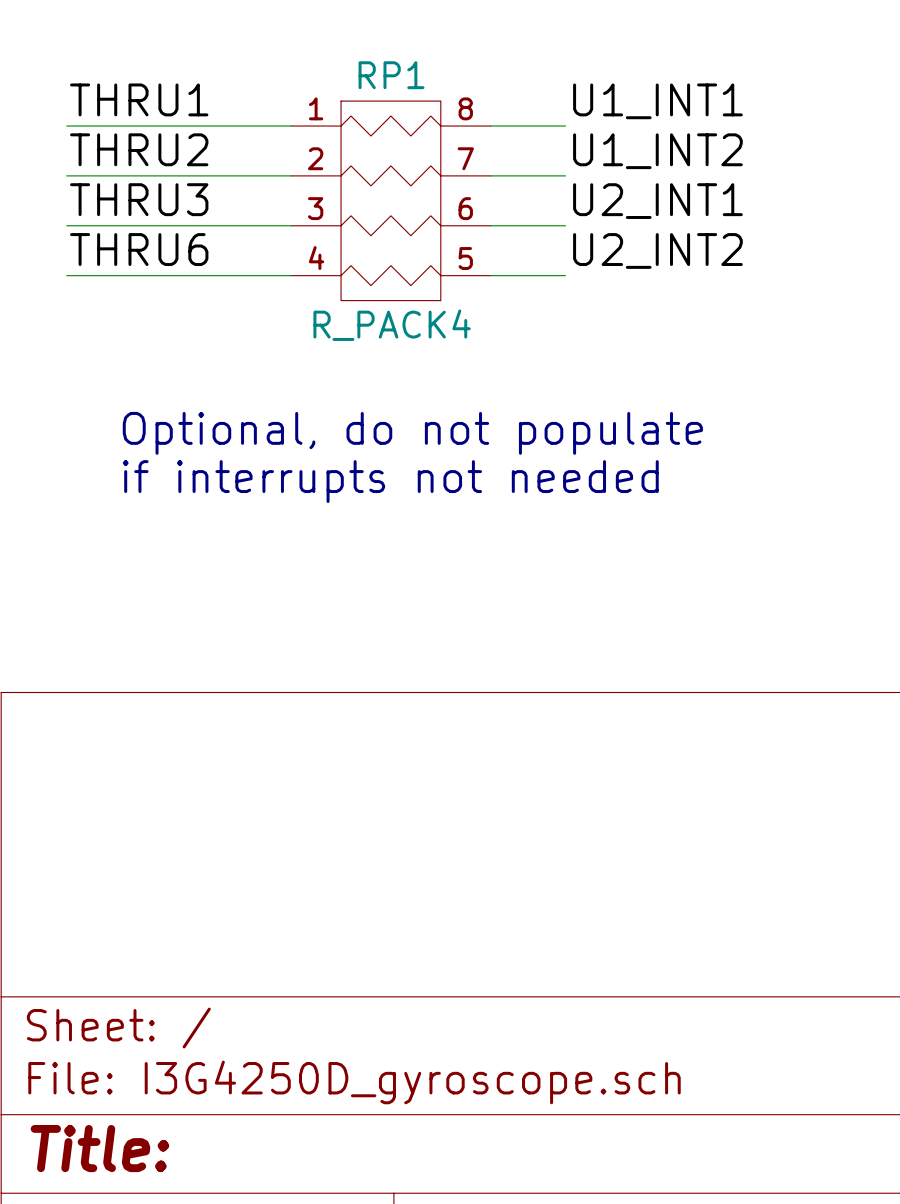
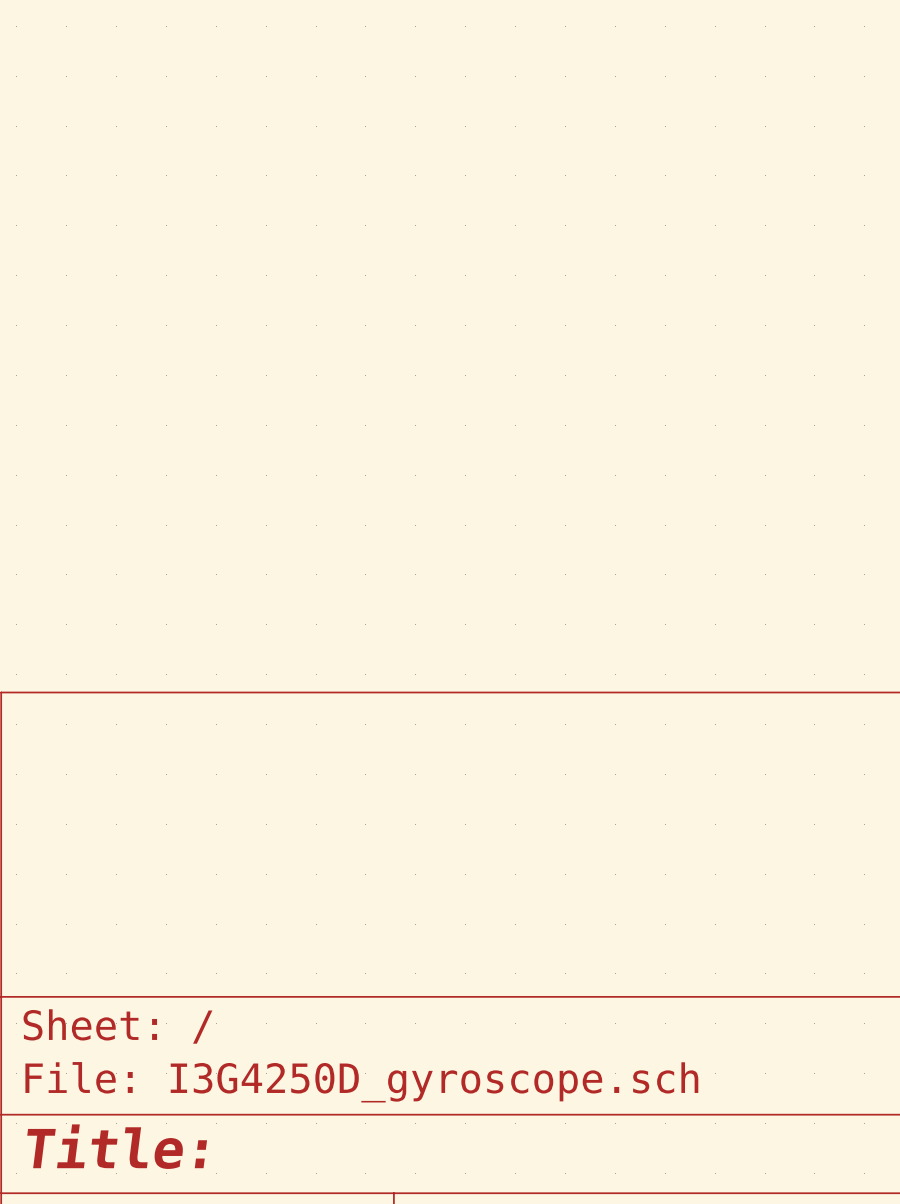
label: THRU1 (139, 99) -> none
label: U1_INT1 (657, 101) -> none
wire: (66, 126) (291, 126) -> none
wire: (490, 126) (565, 126) -> none
label: THRU2 (139, 149) -> none
label: U1_INT2 (657, 151) -> none
wire: (66, 175) (291, 175) -> none
wire: (490, 175) (565, 175) -> none
label: THRU3 (139, 199) -> none
RP1: R_PACK4 (390, 200) -> none
label: U2_INT1 (657, 201) -> none
wire: (66, 225) (291, 225) -> none
wire: (490, 225) (565, 225) -> none
label: THRU6 (139, 249) -> none
label: U2_INT2 (657, 250) -> none
wire: (66, 275) (291, 275) -> none
wire: (490, 275) (565, 275) -> none
text: Optional, do not populate (412, 433) -> none
text: if interrupts not needed (390, 481) -> none

